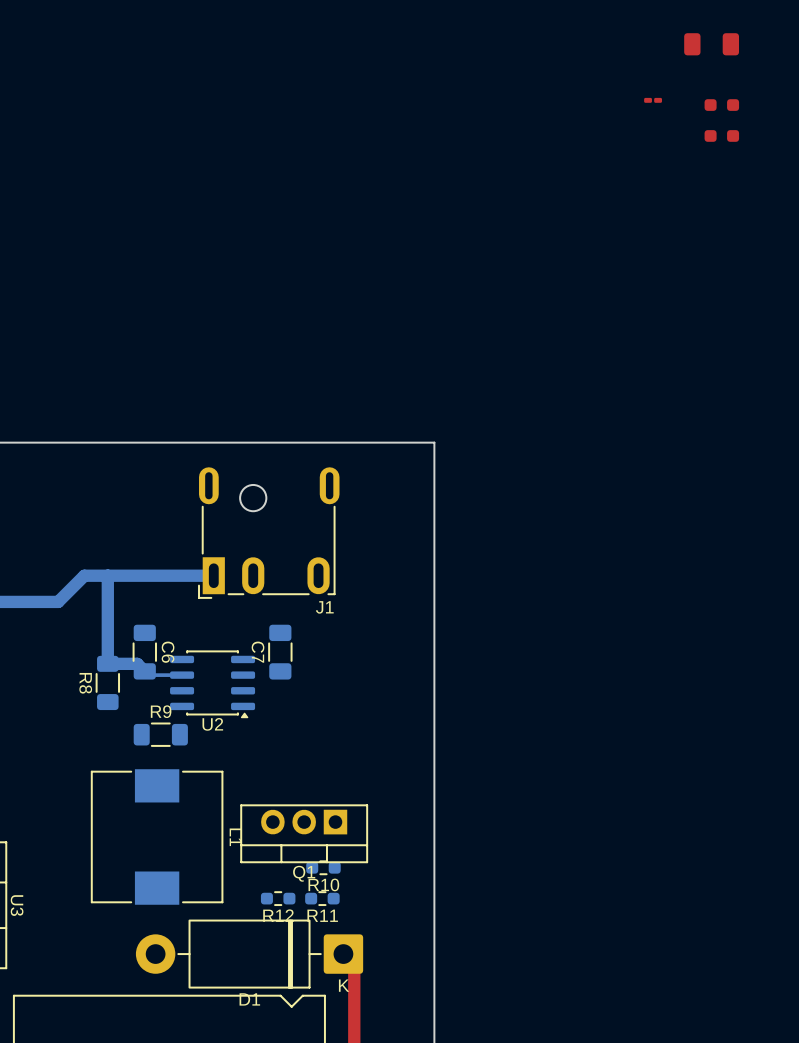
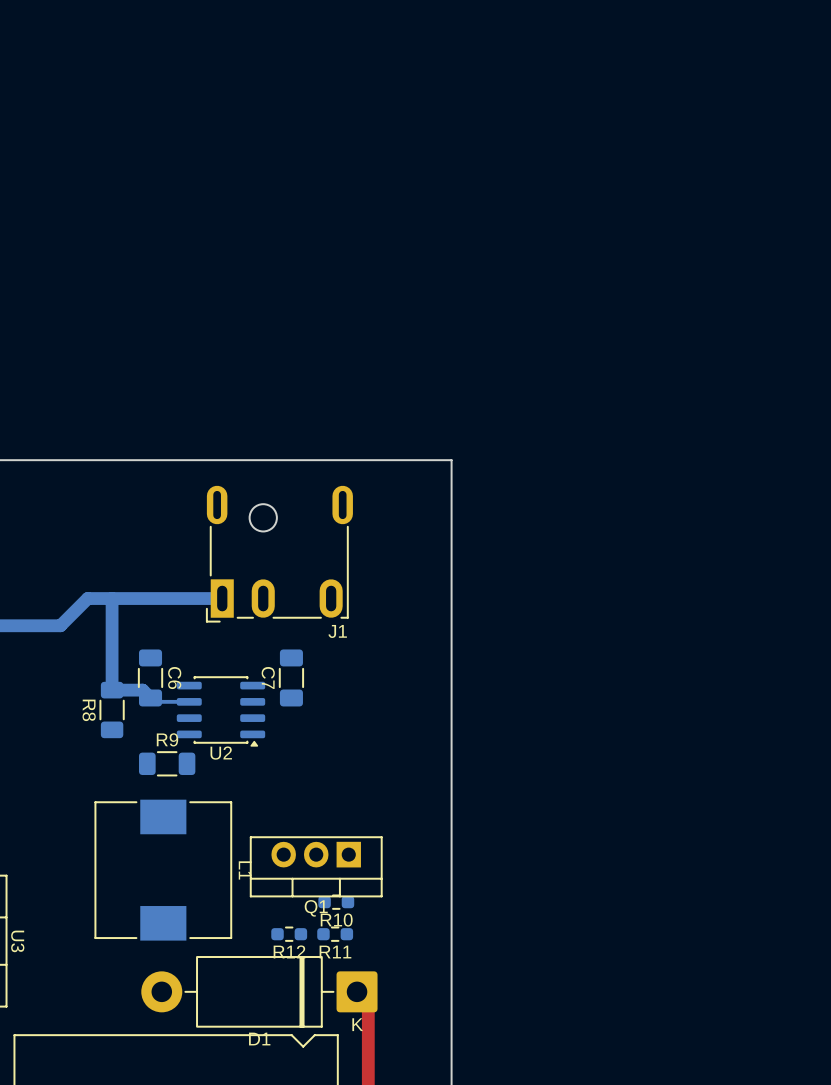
part: (711, 44) -> none
part: (653, 100) -> none
part: (721, 105) -> none
part: (721, 135) -> none

